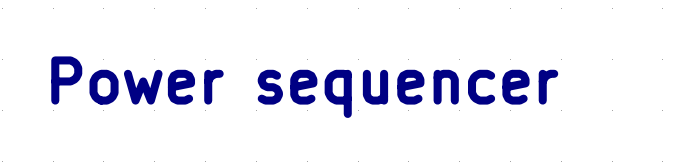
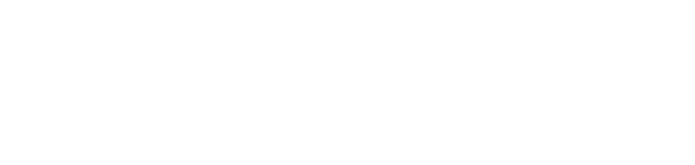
text: Power sequencer (304, 87) -> none

